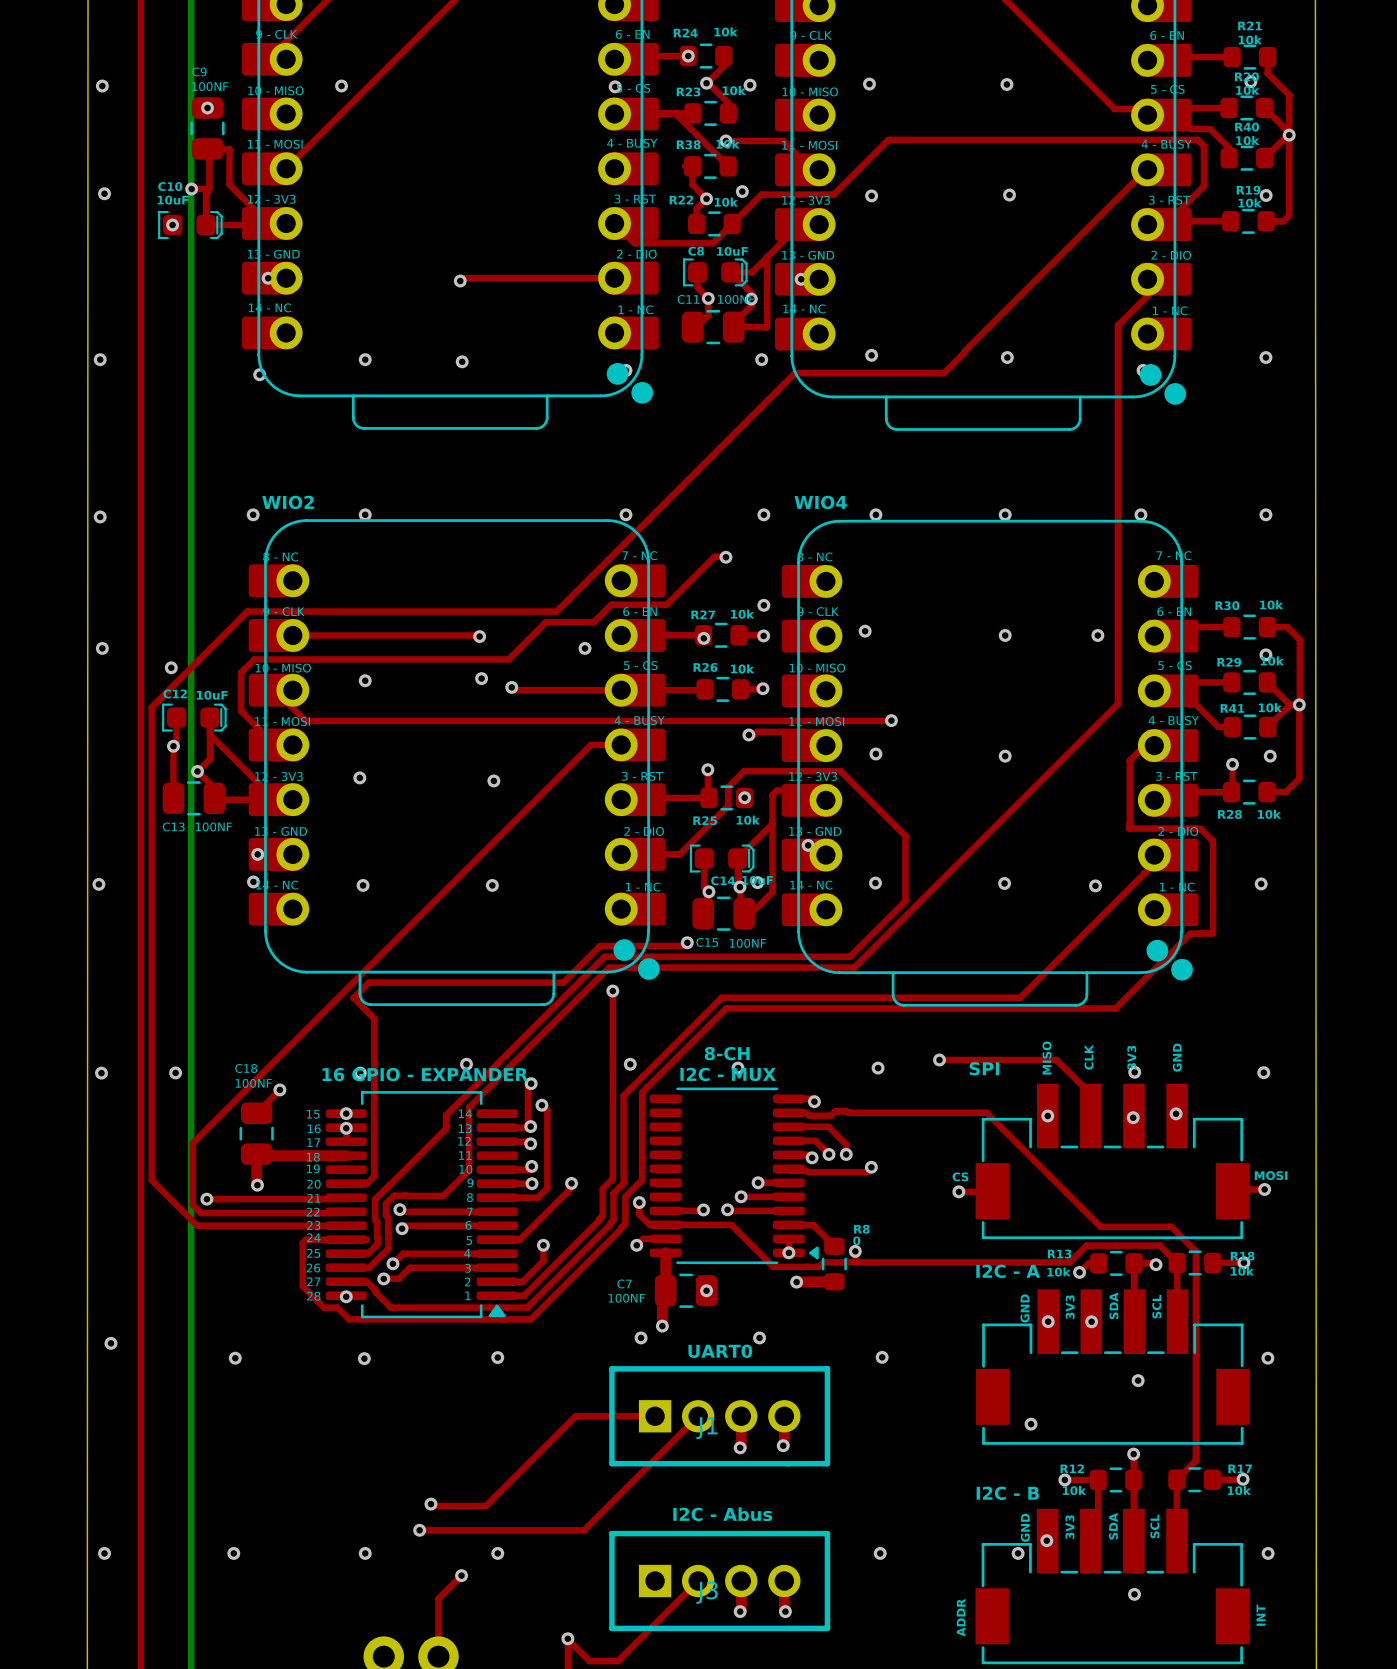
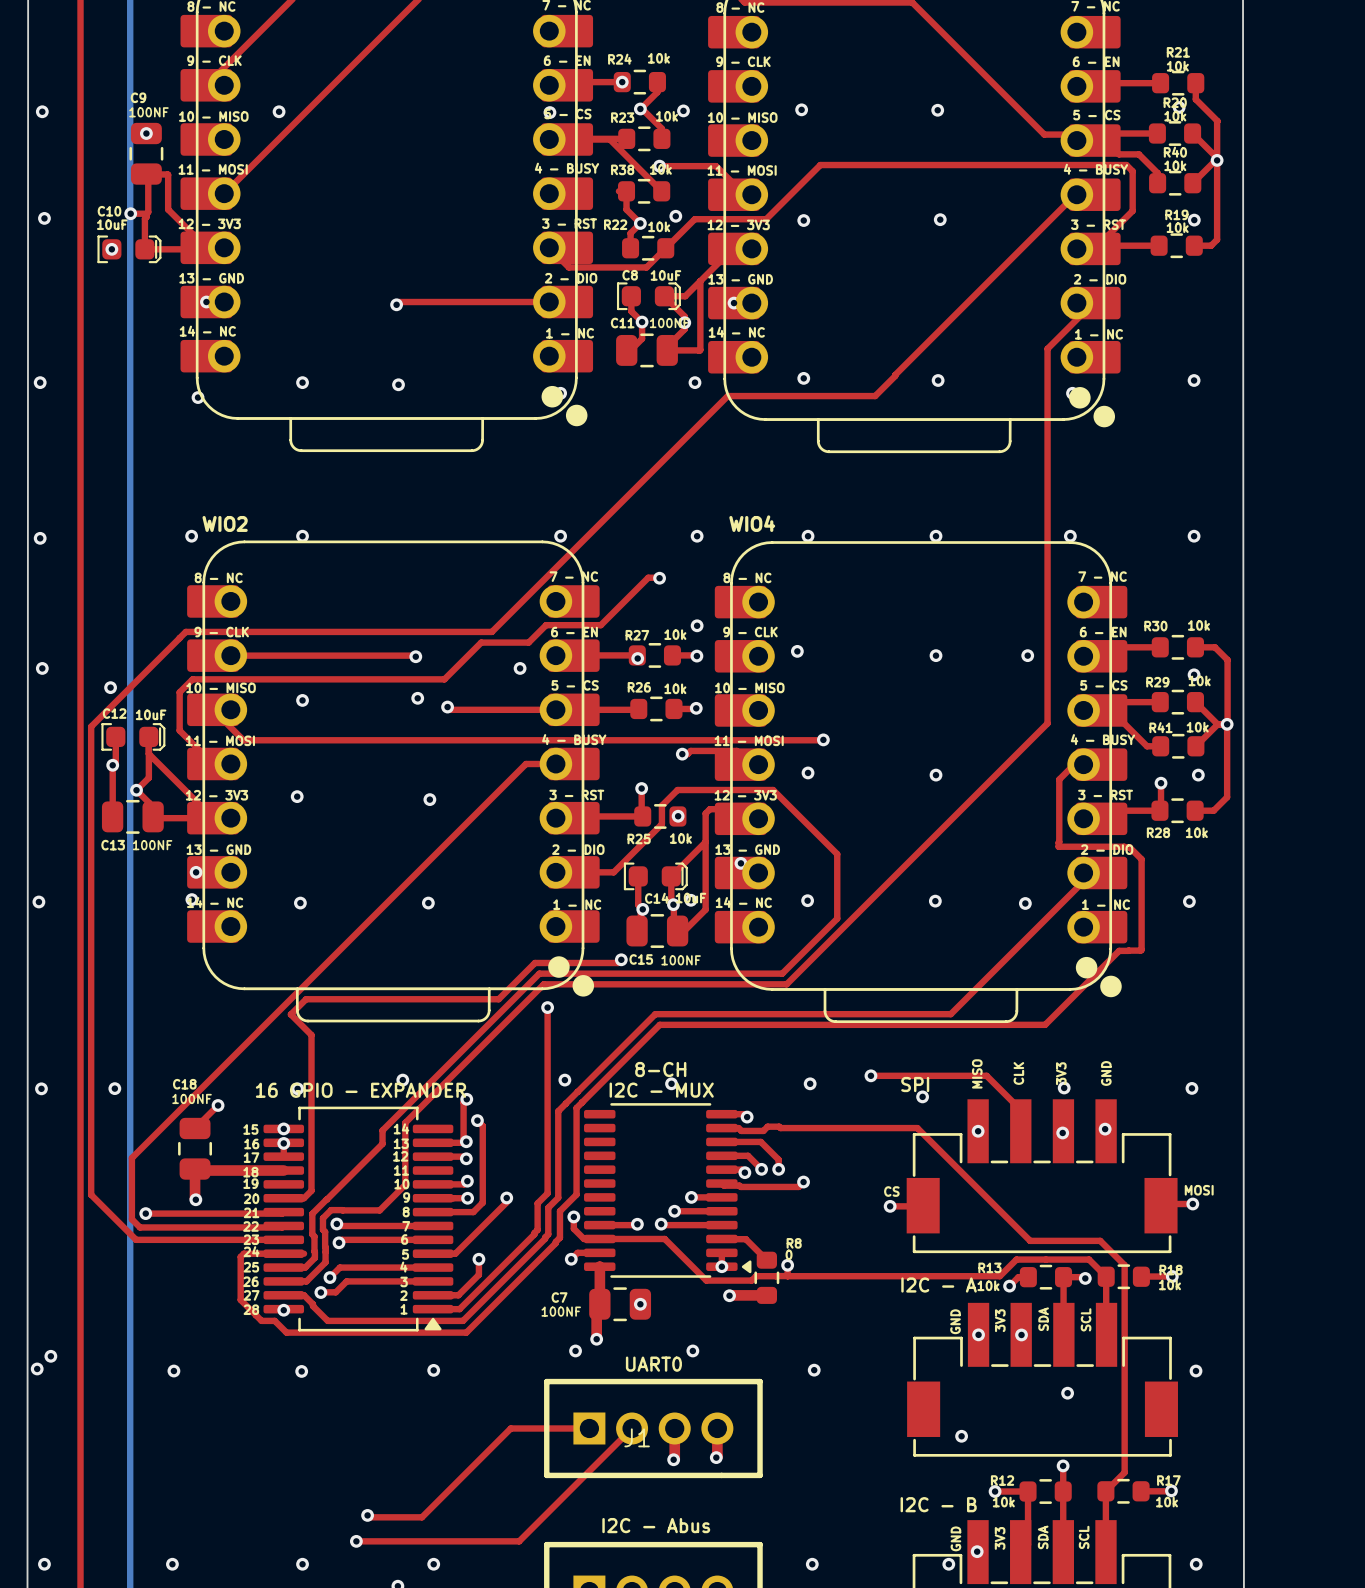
via: none -> (922, 1096)
via: none -> (37, 1368)

